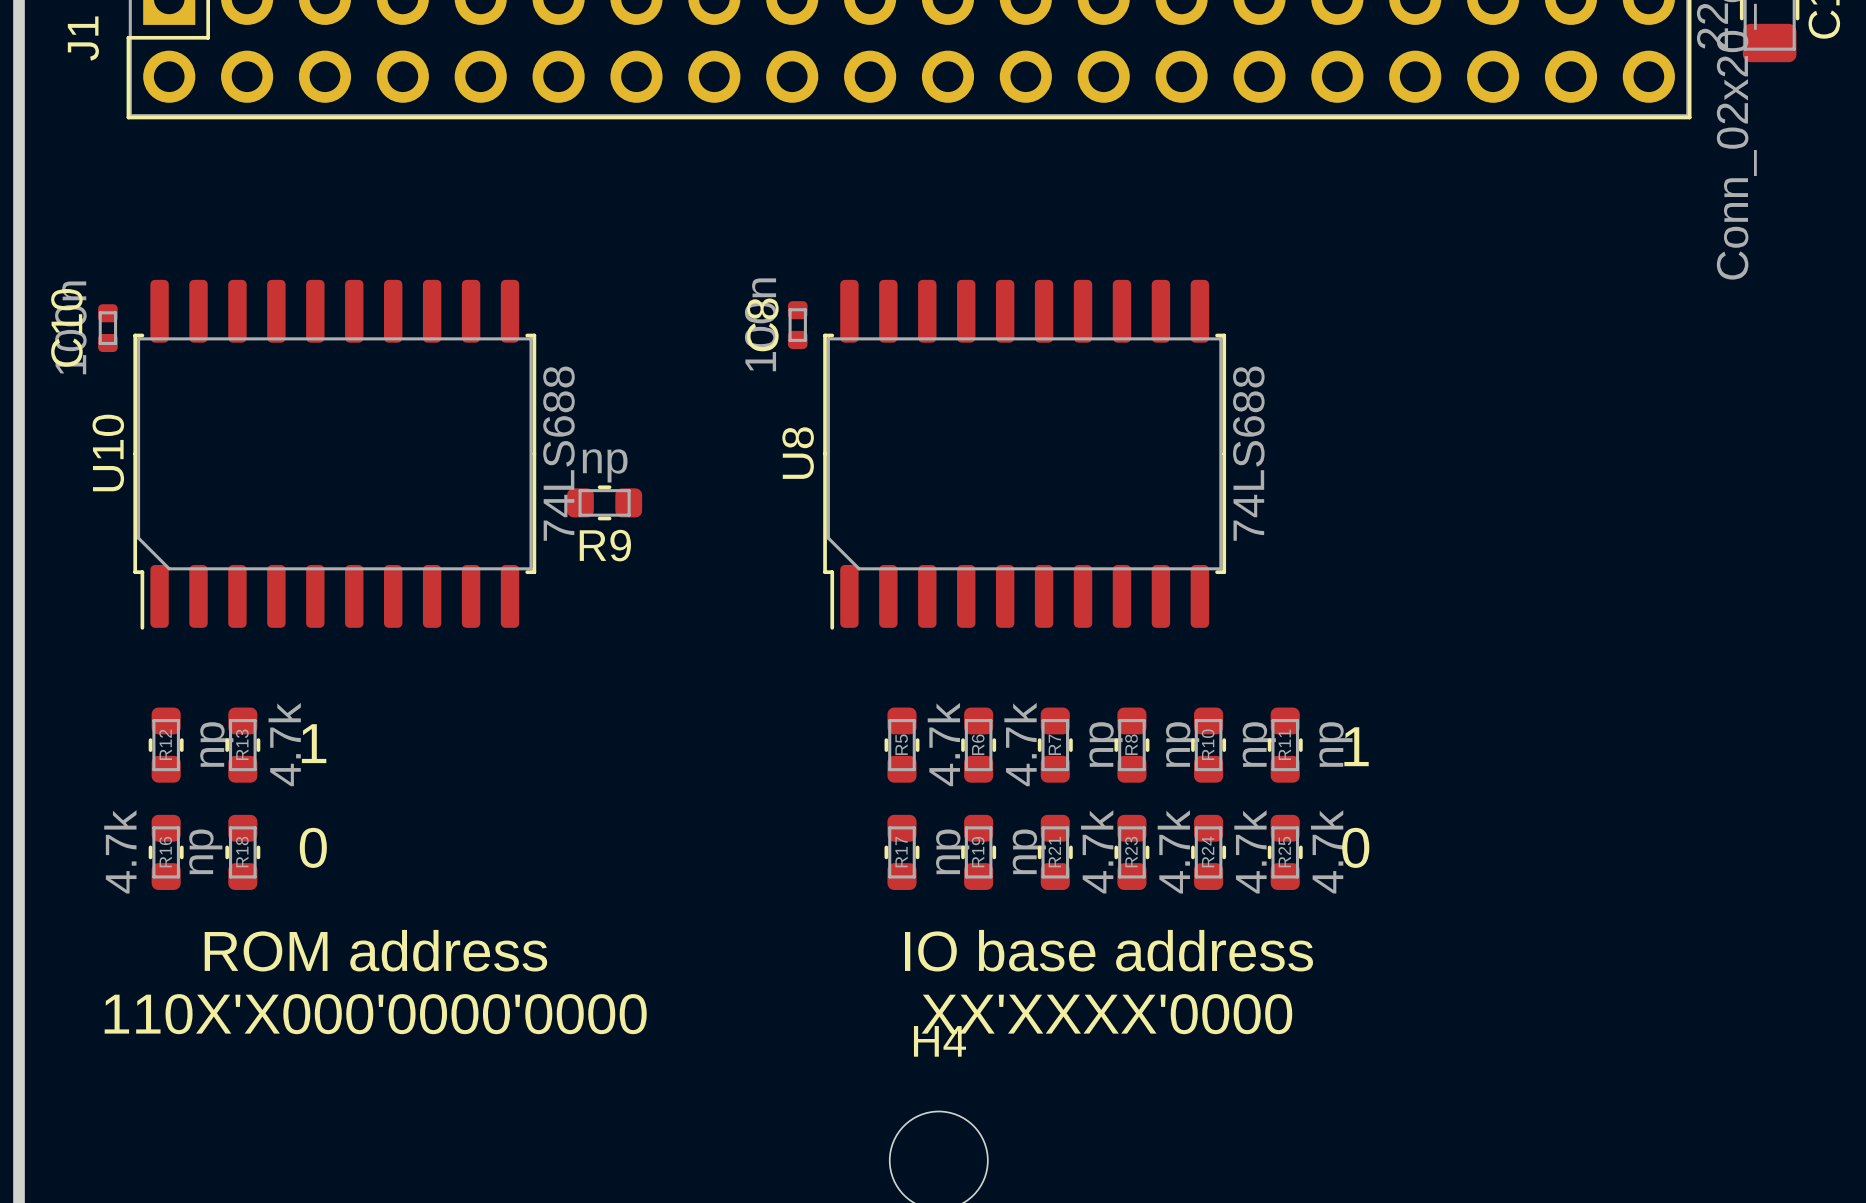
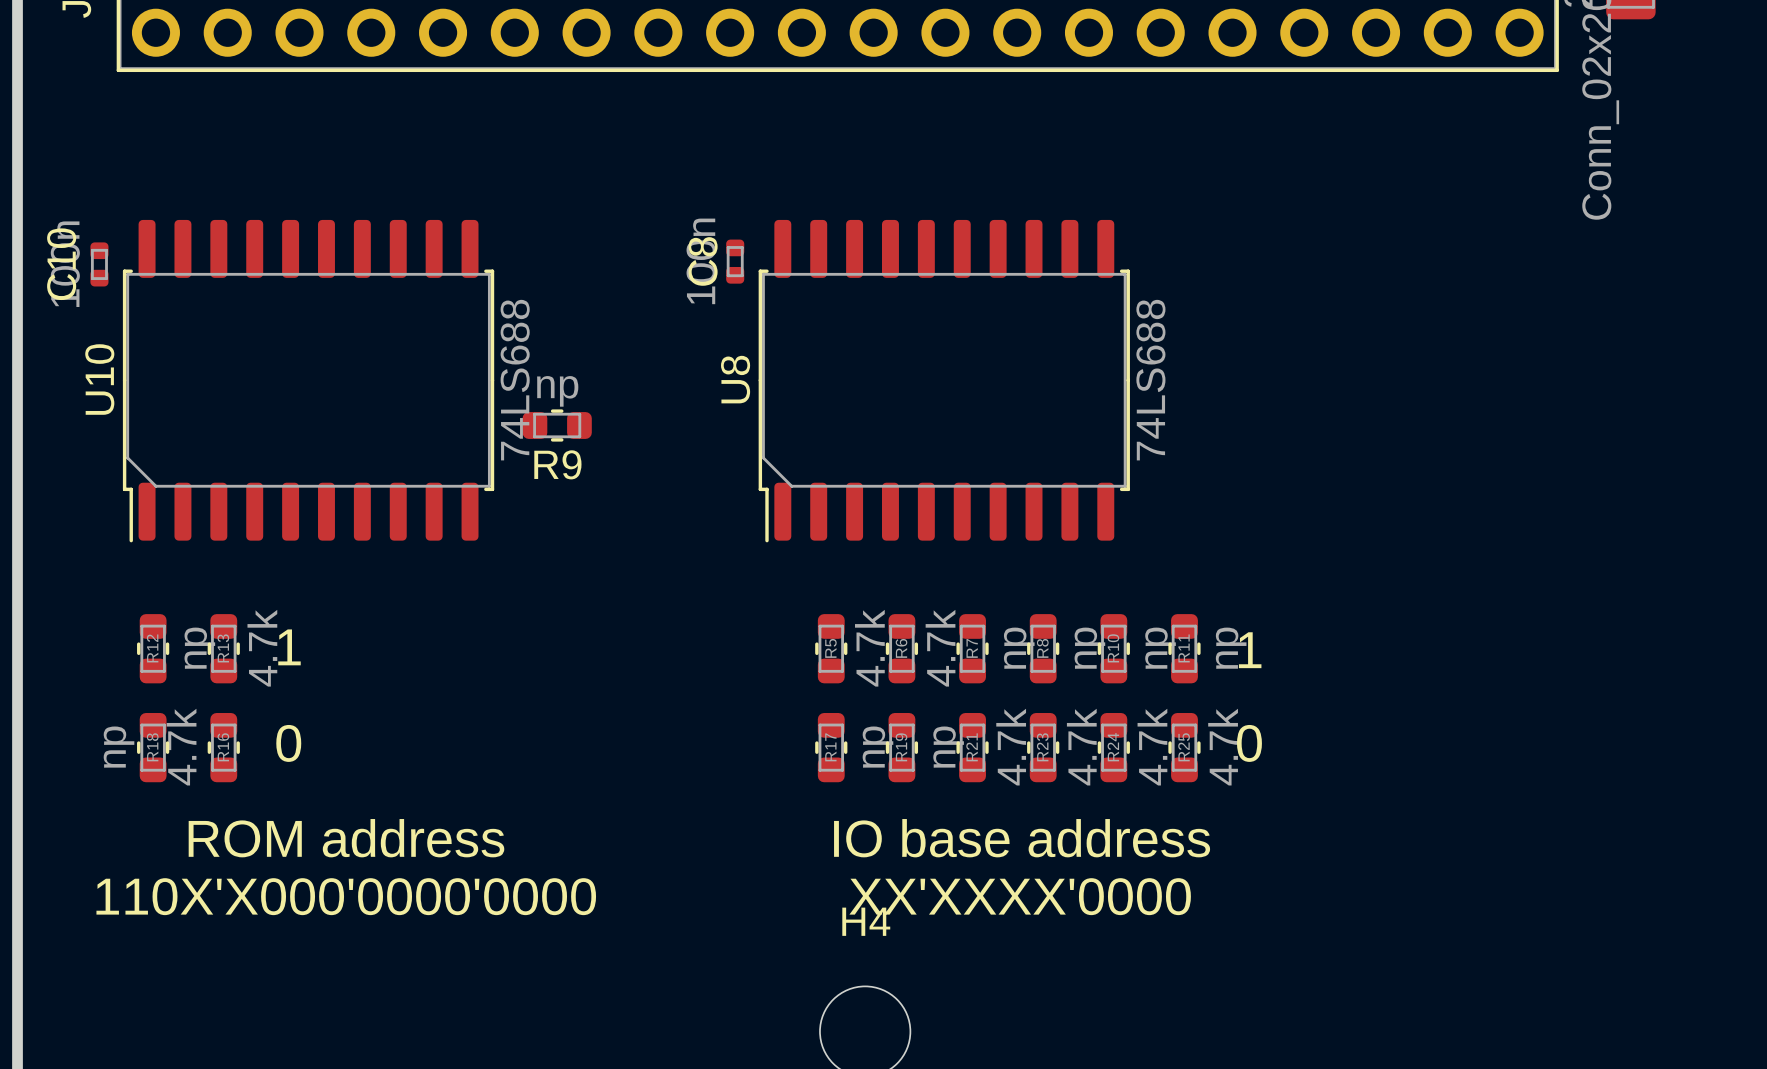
R16 value: 4.7k (120, 851) -> np (119, 747)
R18 value: np (205, 851) -> 4.7k (181, 747)
R16 name: R16 (165, 852) -> R18 (152, 747)
R18 name: R18 (242, 852) -> R16 (223, 747)

